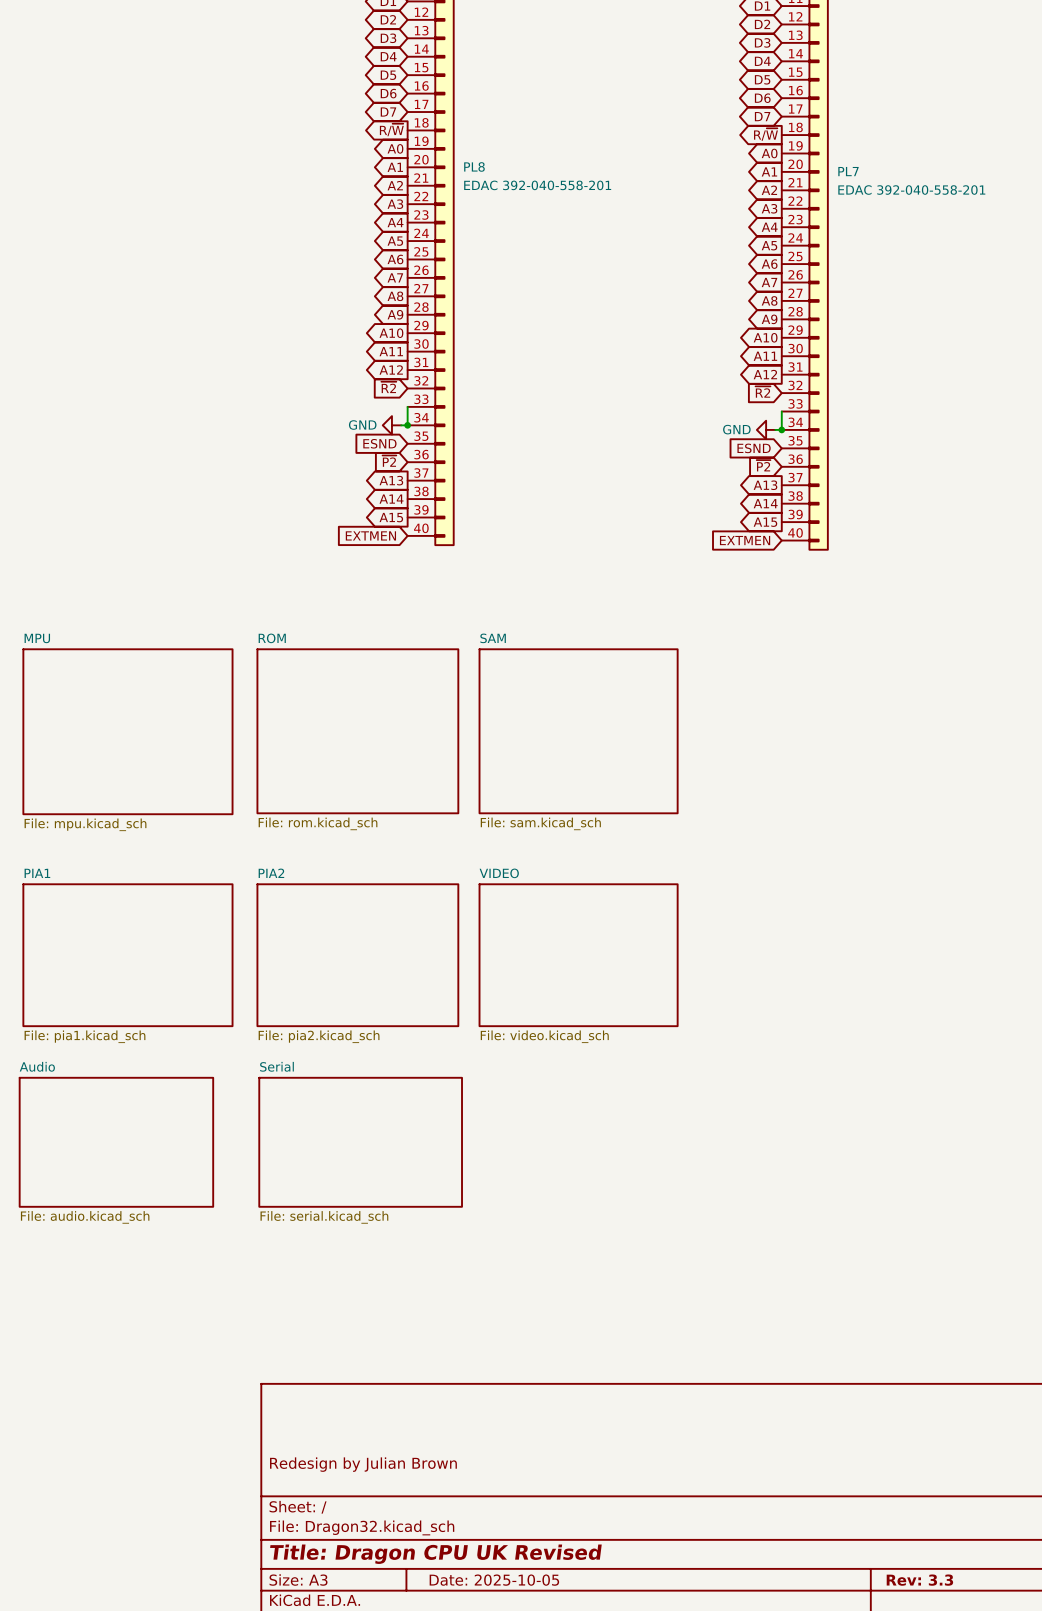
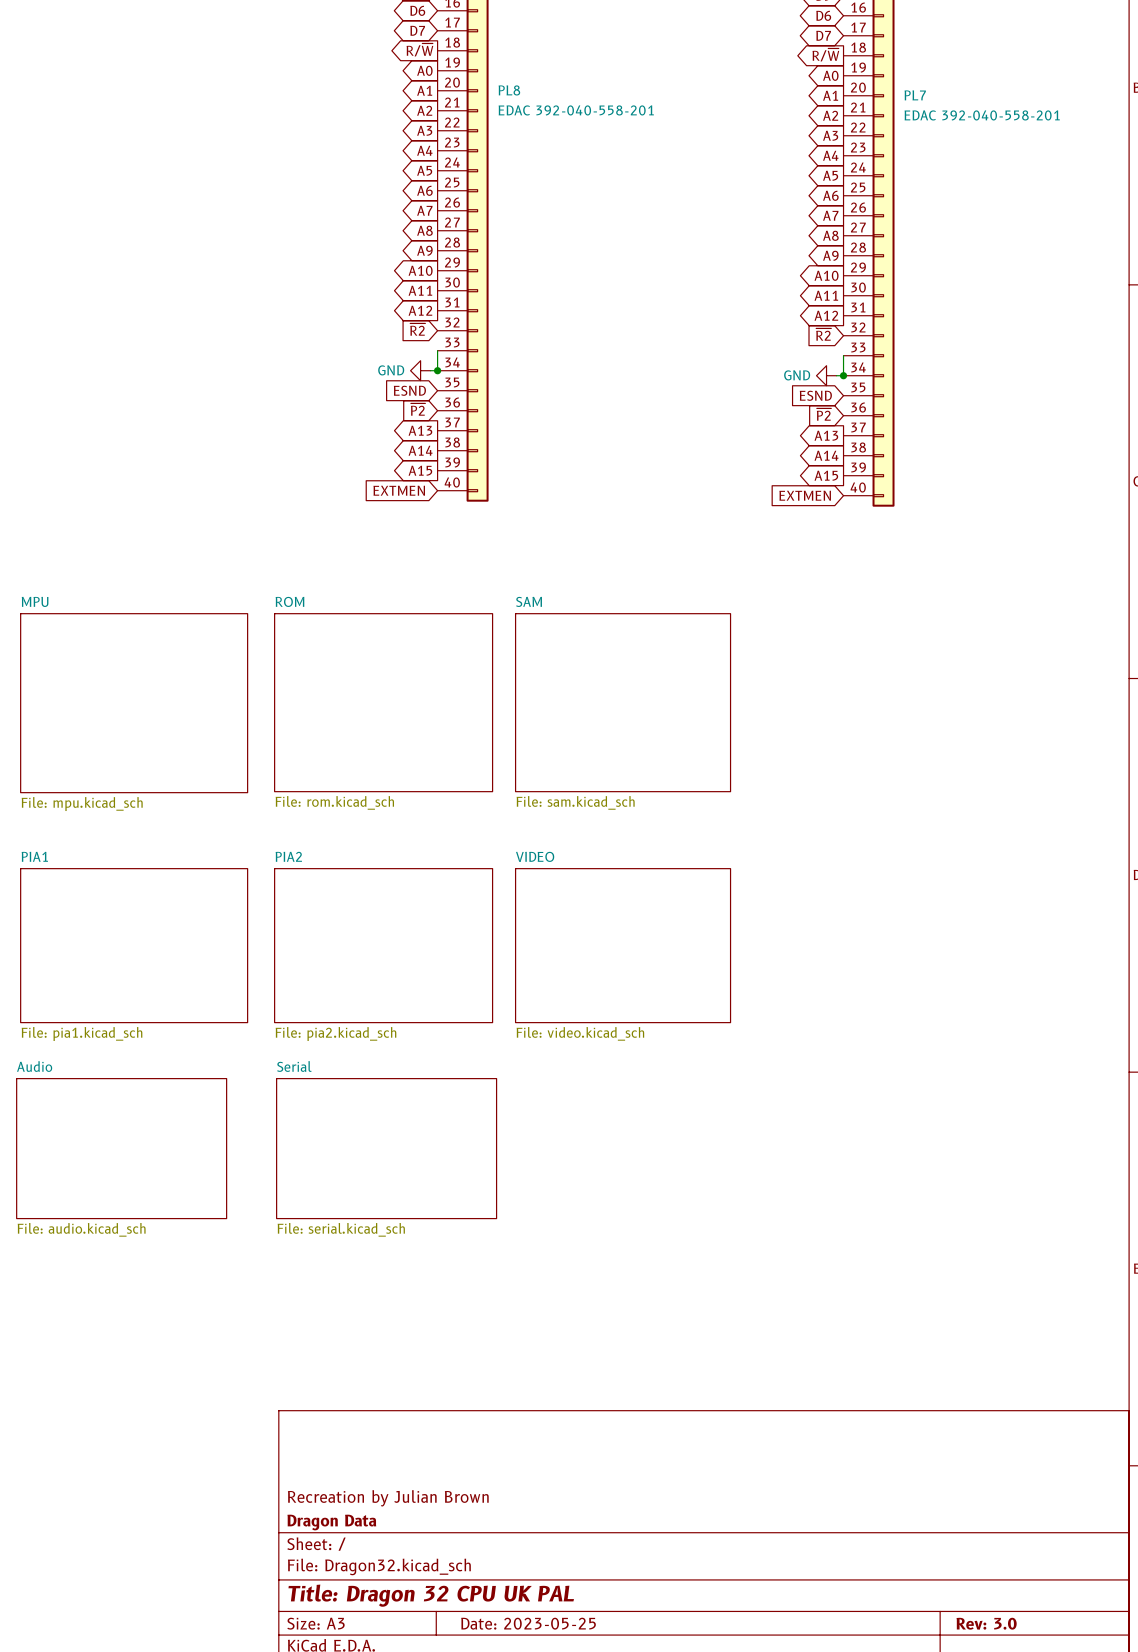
title block: Redesign by Julian Brown (363, 1464) -> Recreation by Julian Brown (388, 1498)
title block: none -> Dragon Data (331, 1522)
title block: Title: Dragon CPU UK Revised (435, 1554) -> Title: Dragon 32 CPU UK PAL (431, 1595)
title block: Date: 2025-10-05 (494, 1580) -> Date: 2023-05-25 (528, 1623)
title block: Rev: 3.3 (919, 1580) -> Rev: 3.0 (986, 1623)

